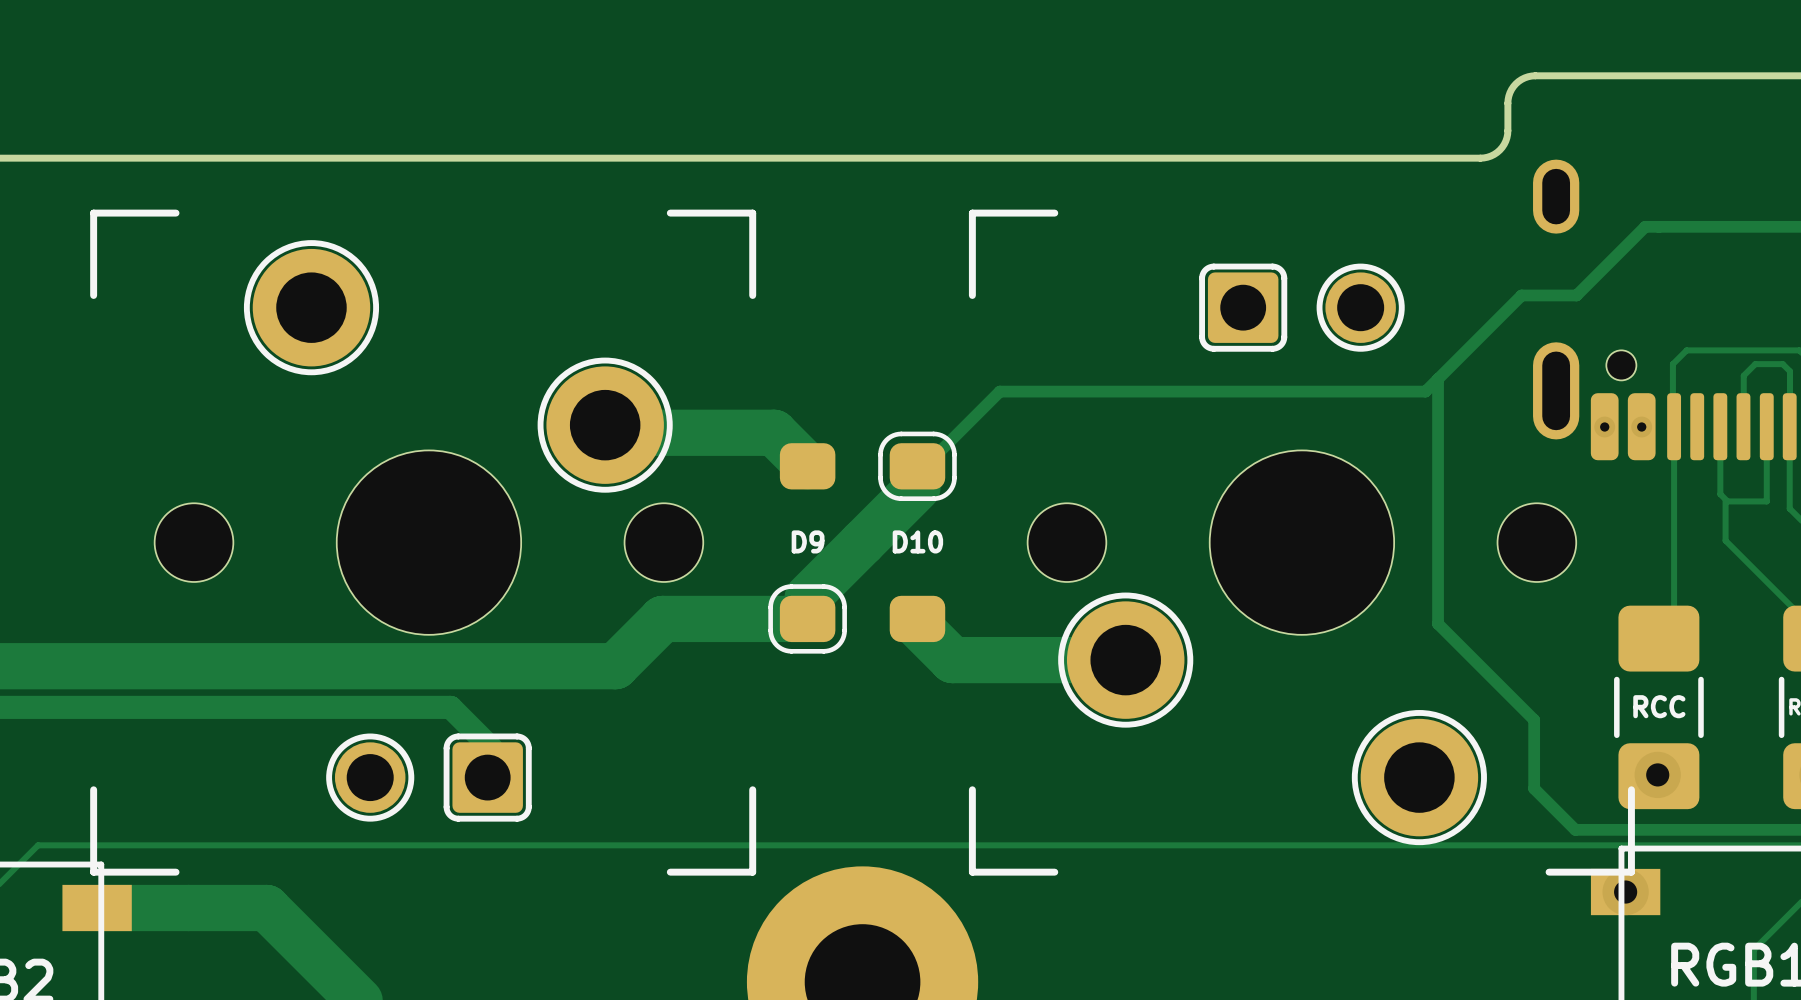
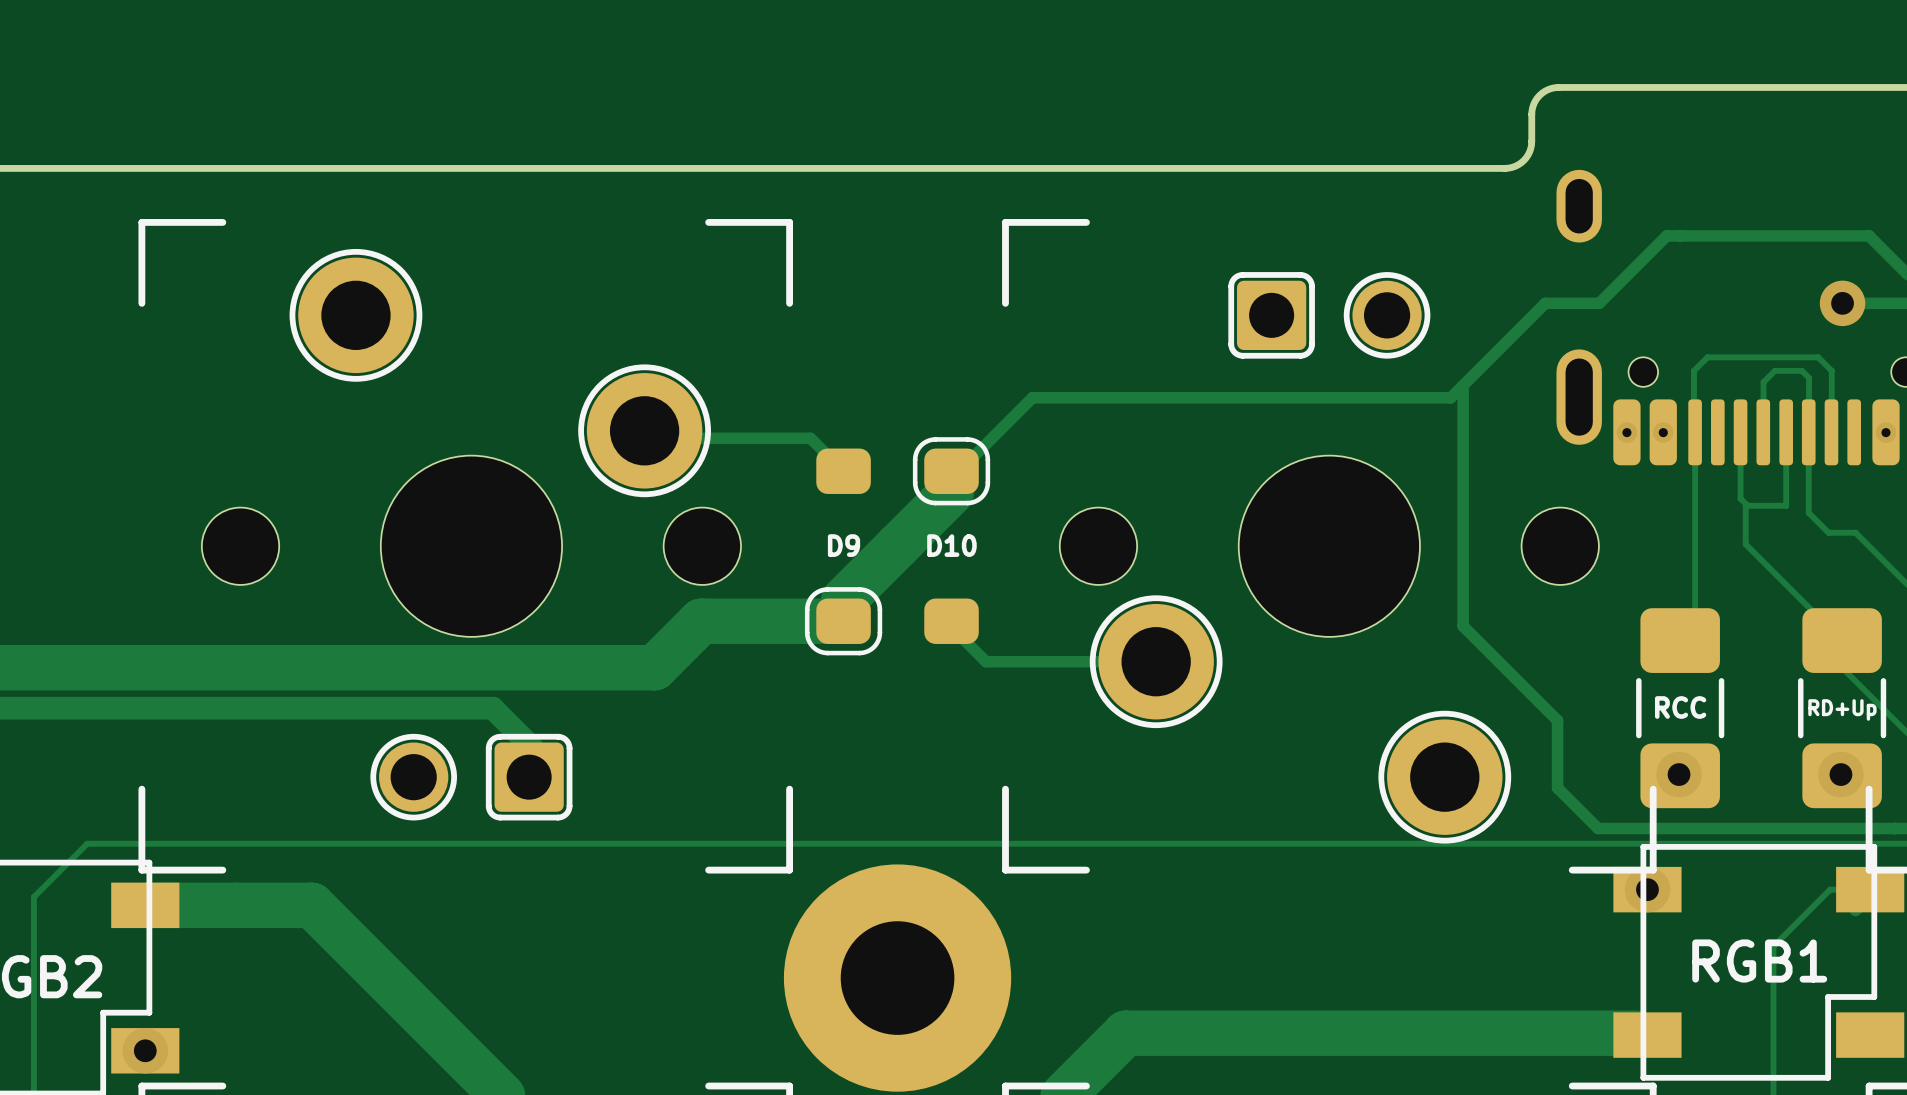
track width: thick (615, 432) (774, 432) (807, 466) -> thin (654, 438) (810, 438) (843, 471)
track width: thick (917, 625) (952, 660) (1125, 660) -> thin (951, 627) (986, 661) (1156, 661)

